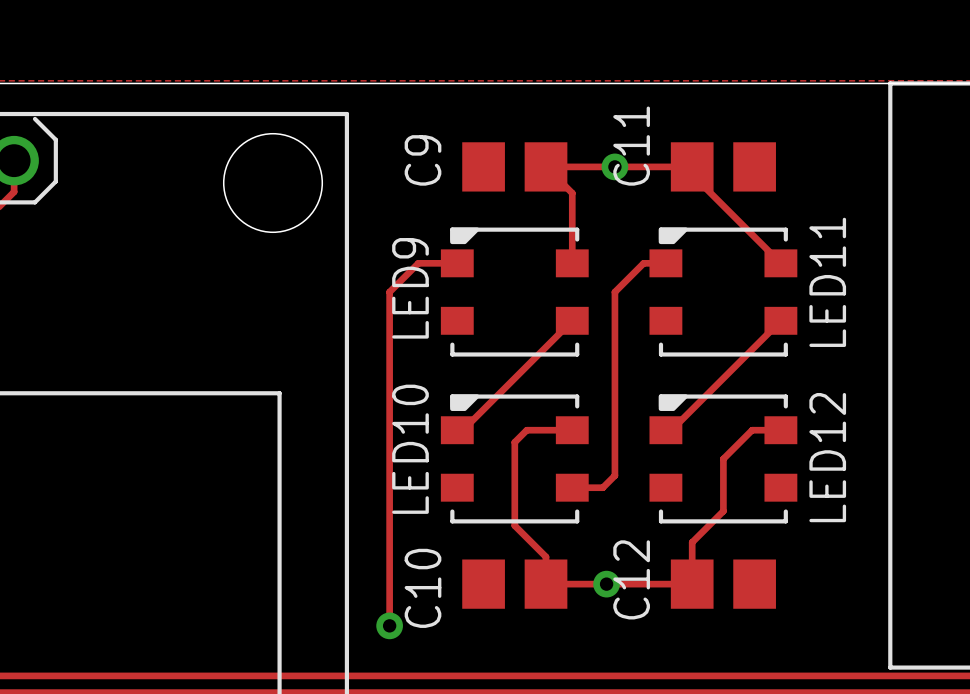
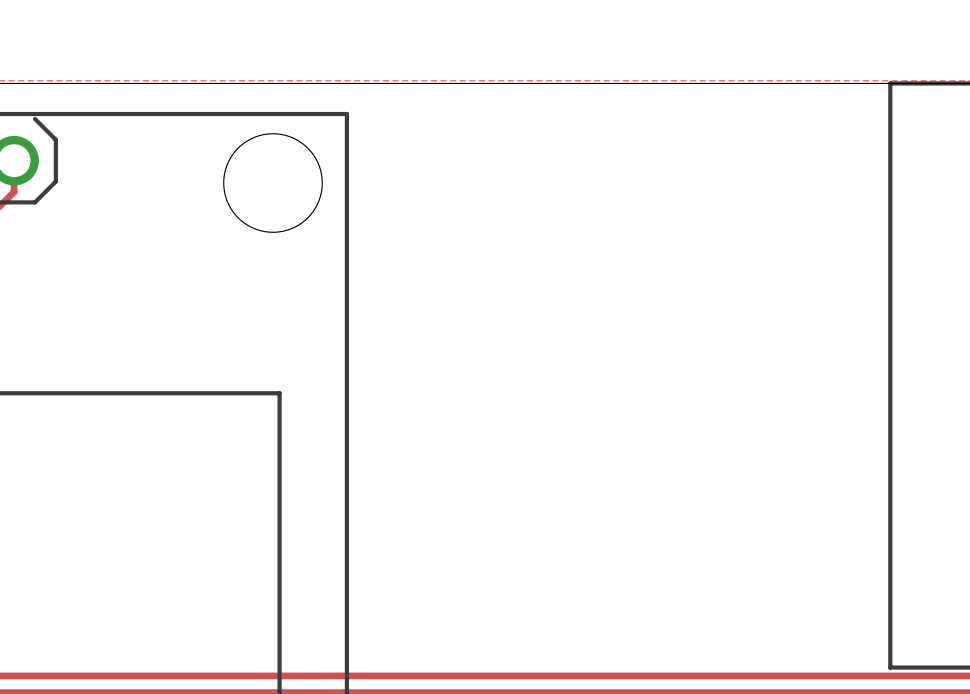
C9: (514, 166) -> none
via: (614, 166) -> none
track: (684, 166) (780, 263) (783, 260) -> none
track: (692, 166) (546, 166) (572, 193) (572, 263) -> none
C11: (723, 166) -> none
track: (457, 263) (418, 263) (389, 292) (389, 625) -> none
track: (665, 263) (643, 263) (614, 292) (614, 475) (602, 487) (572, 487) -> none
LED9: (514, 291) -> none
LED11: (723, 291) -> none
track: (572, 320) (462, 430) (457, 430) -> none
track: (780, 320) (671, 430) (665, 430) -> none
track: (783, 427) (780, 430) (752, 430) (723, 458) (723, 511) (692, 542) (692, 584) (546, 584) (546, 556) (514, 525) (514, 442) (526, 430) (572, 430) -> none
LED10: (514, 458) -> none
LED12: (723, 458) -> none
C10: (514, 584) -> none
via: (606, 584) -> none
C12: (723, 584) -> none
via: (389, 625) -> none

